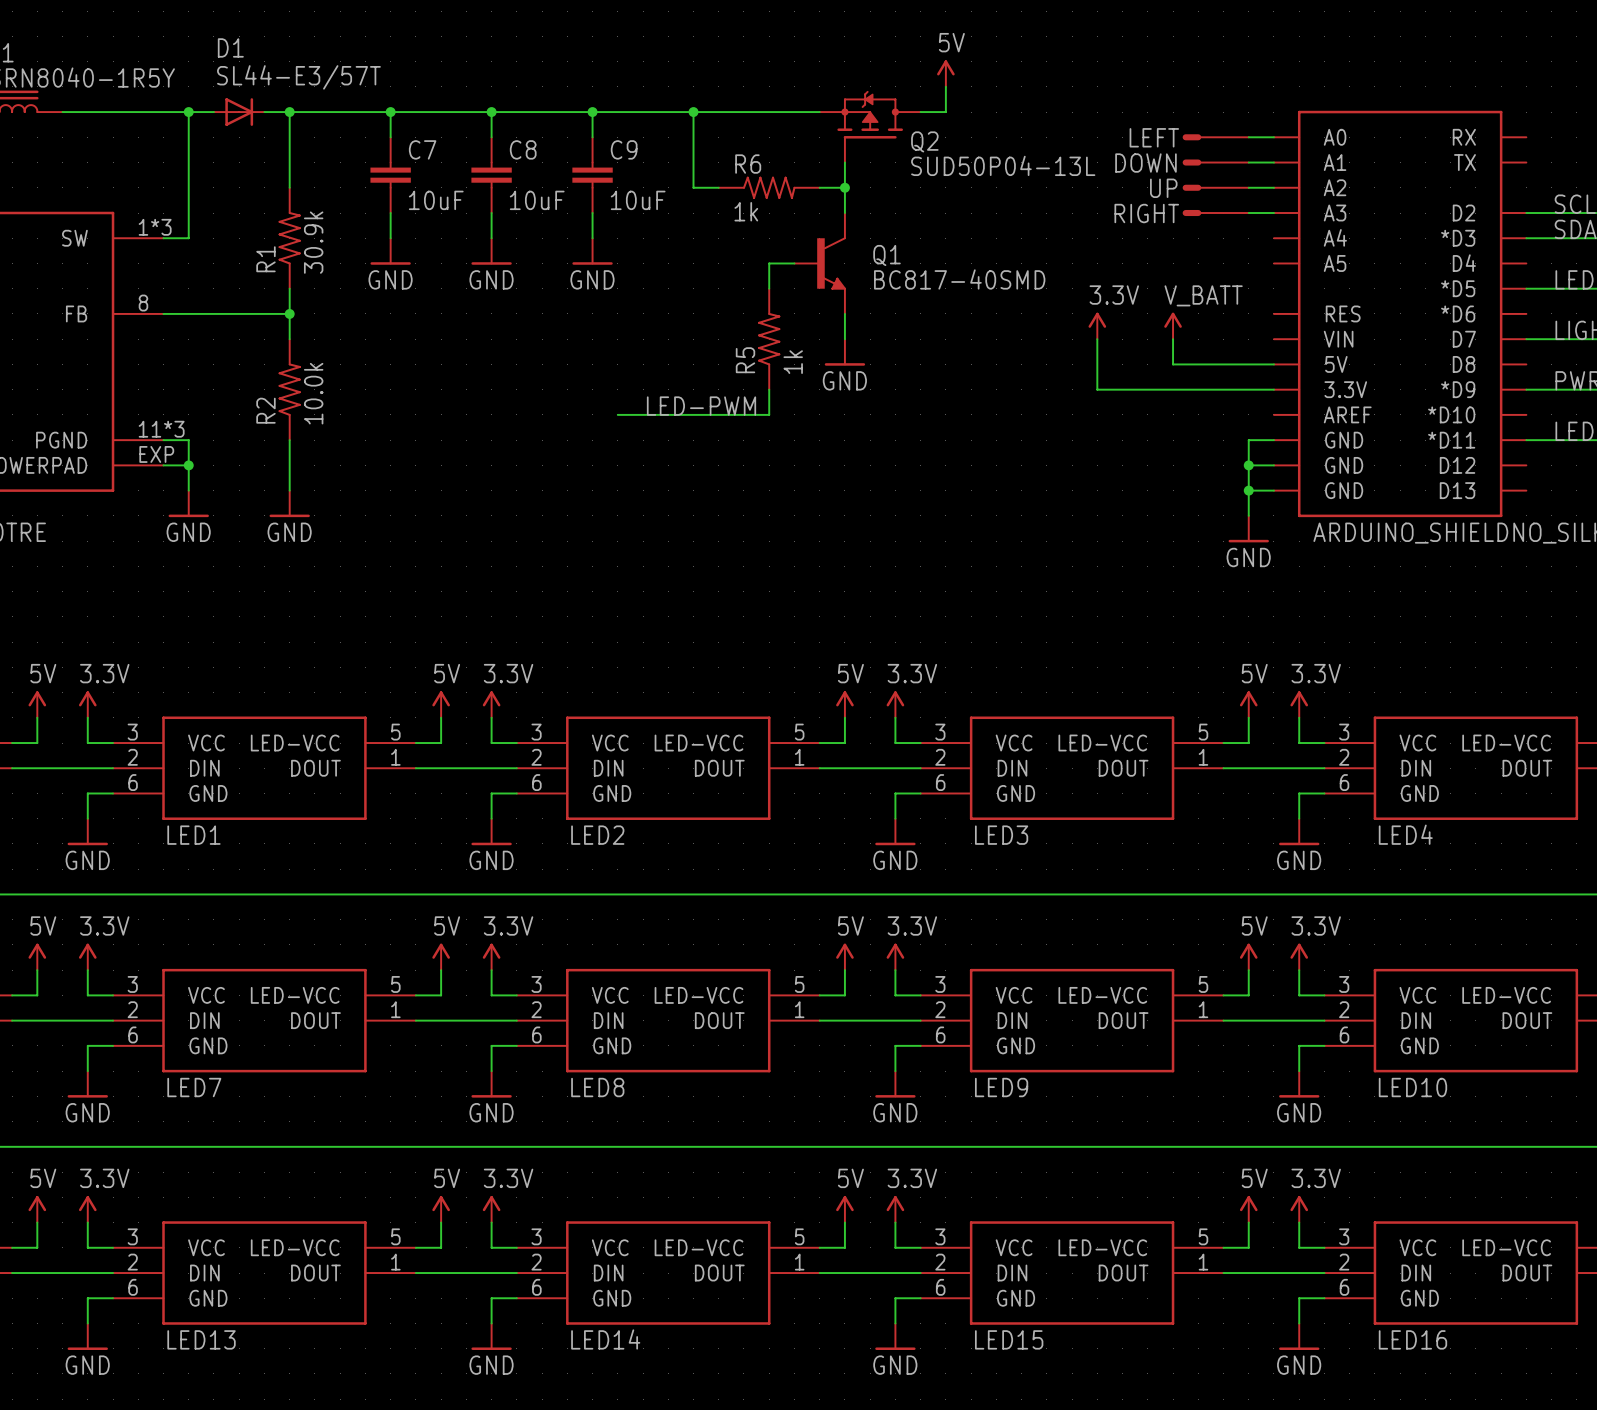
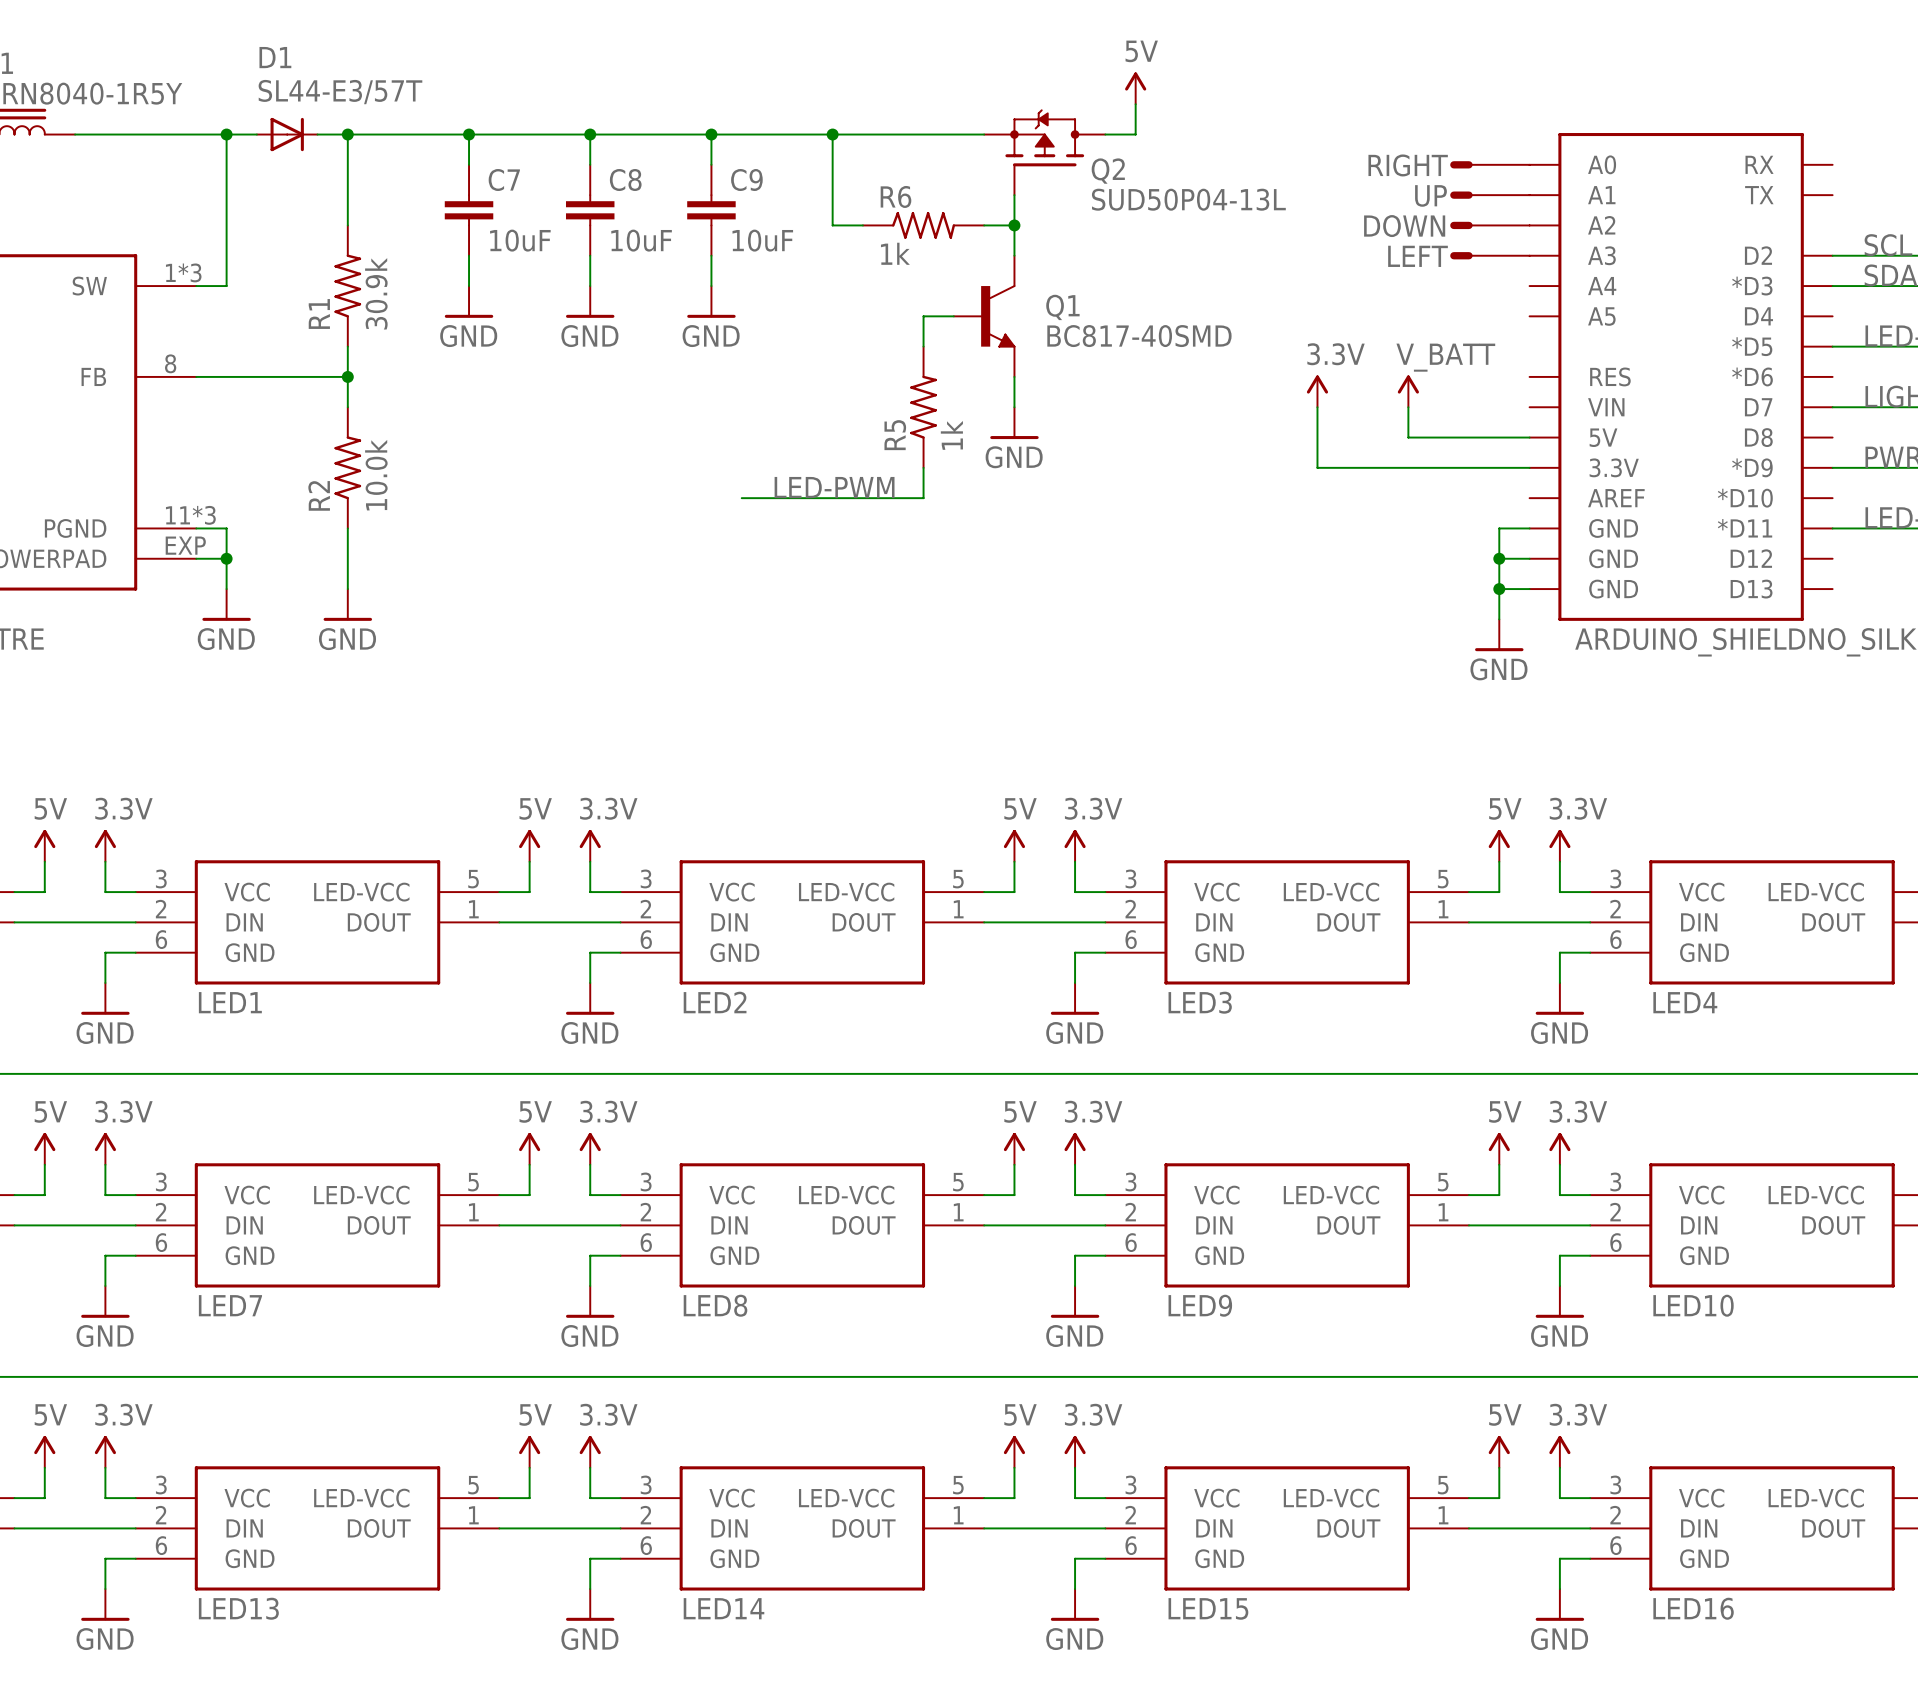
LEFT position: (1215, 137) -> (1489, 255)
DOWN position: (1215, 162) -> (1489, 225)
UP position: (1215, 187) -> (1489, 195)
RIGHT position: (1215, 213) -> (1489, 164)

